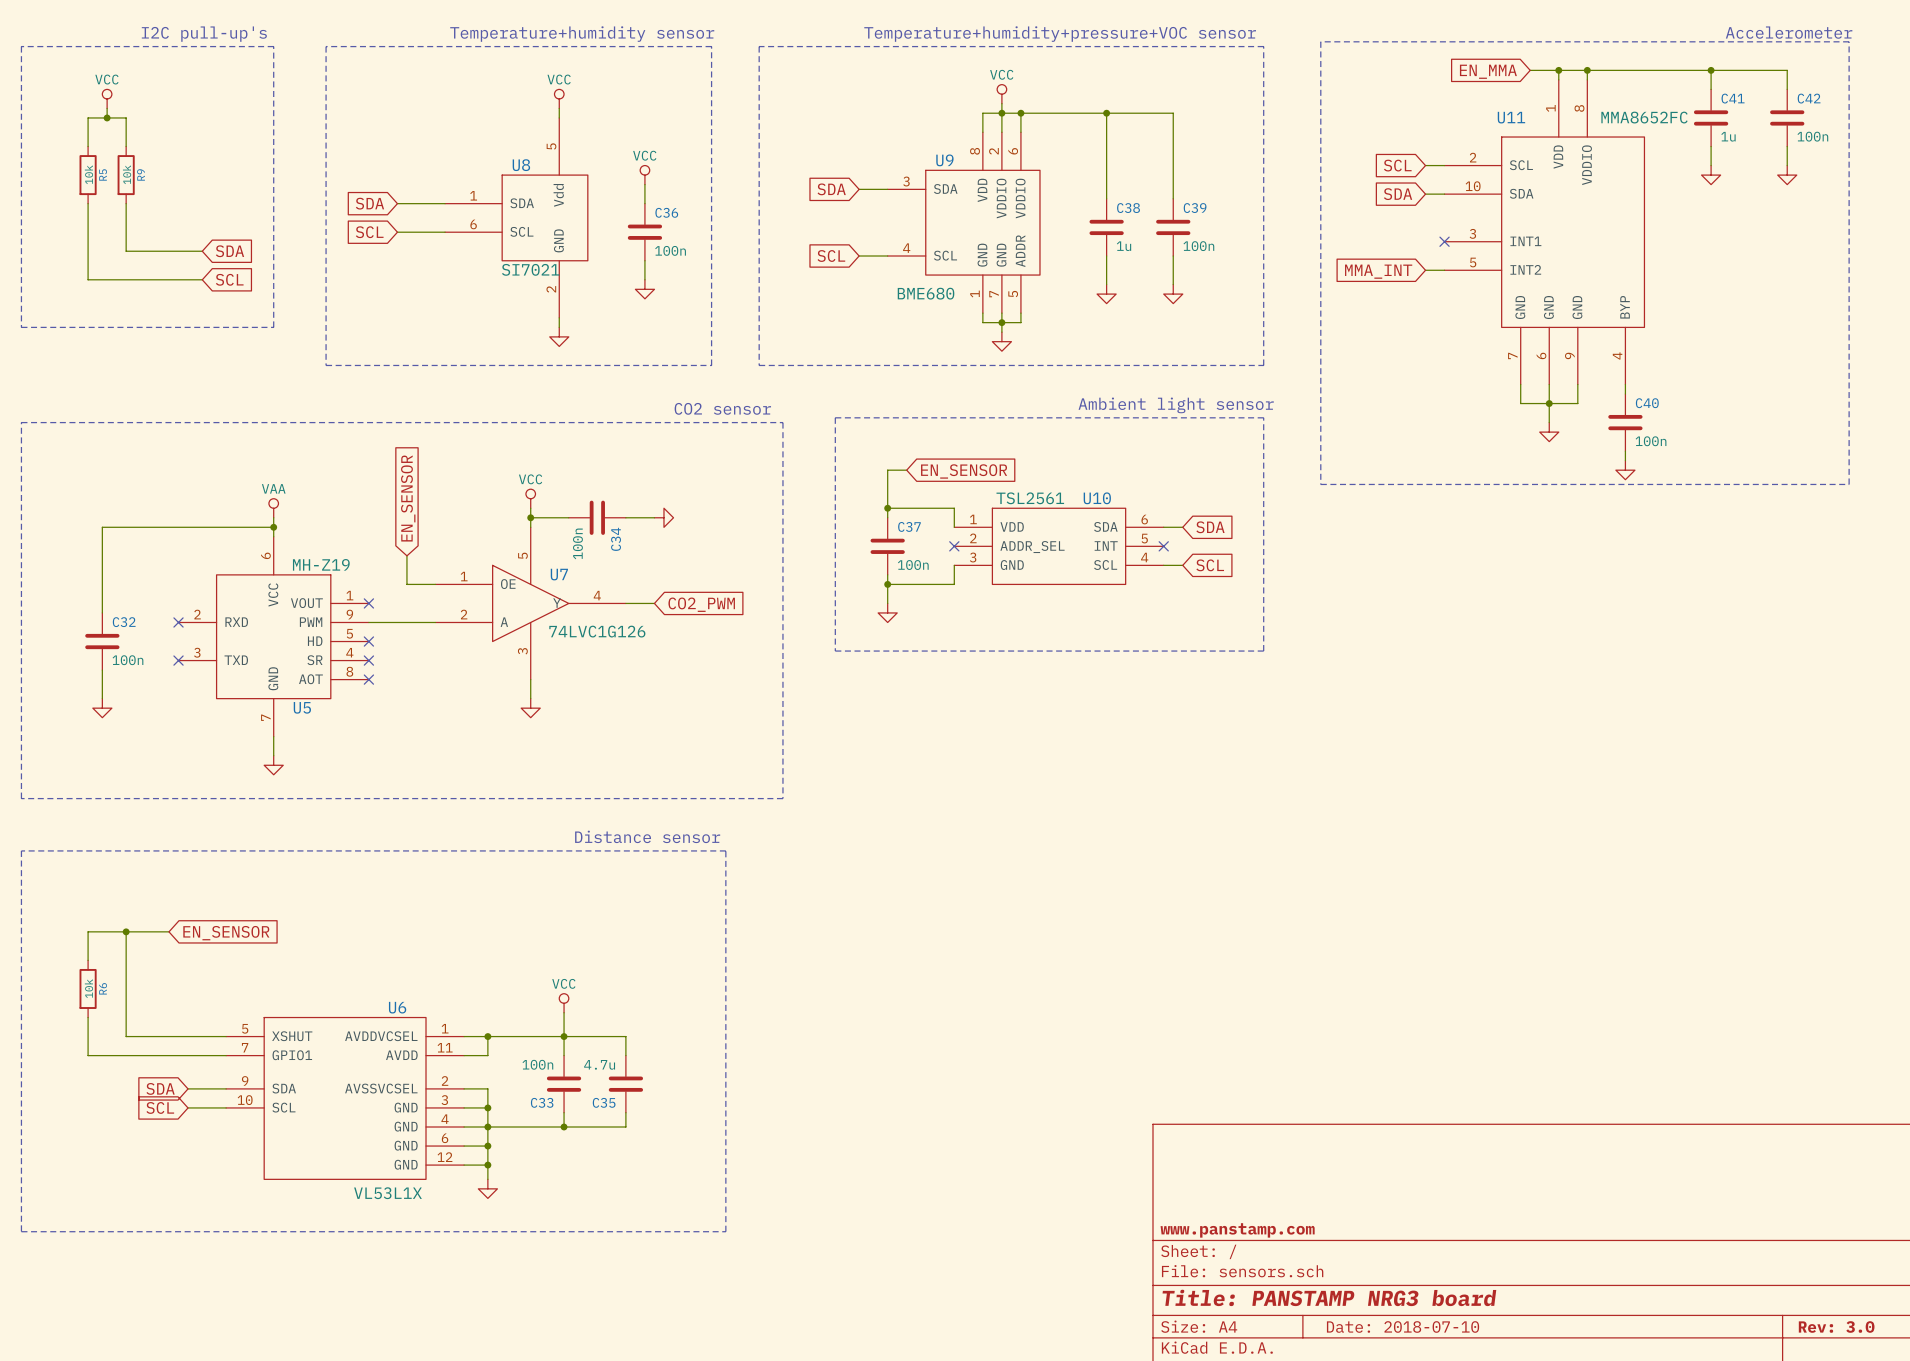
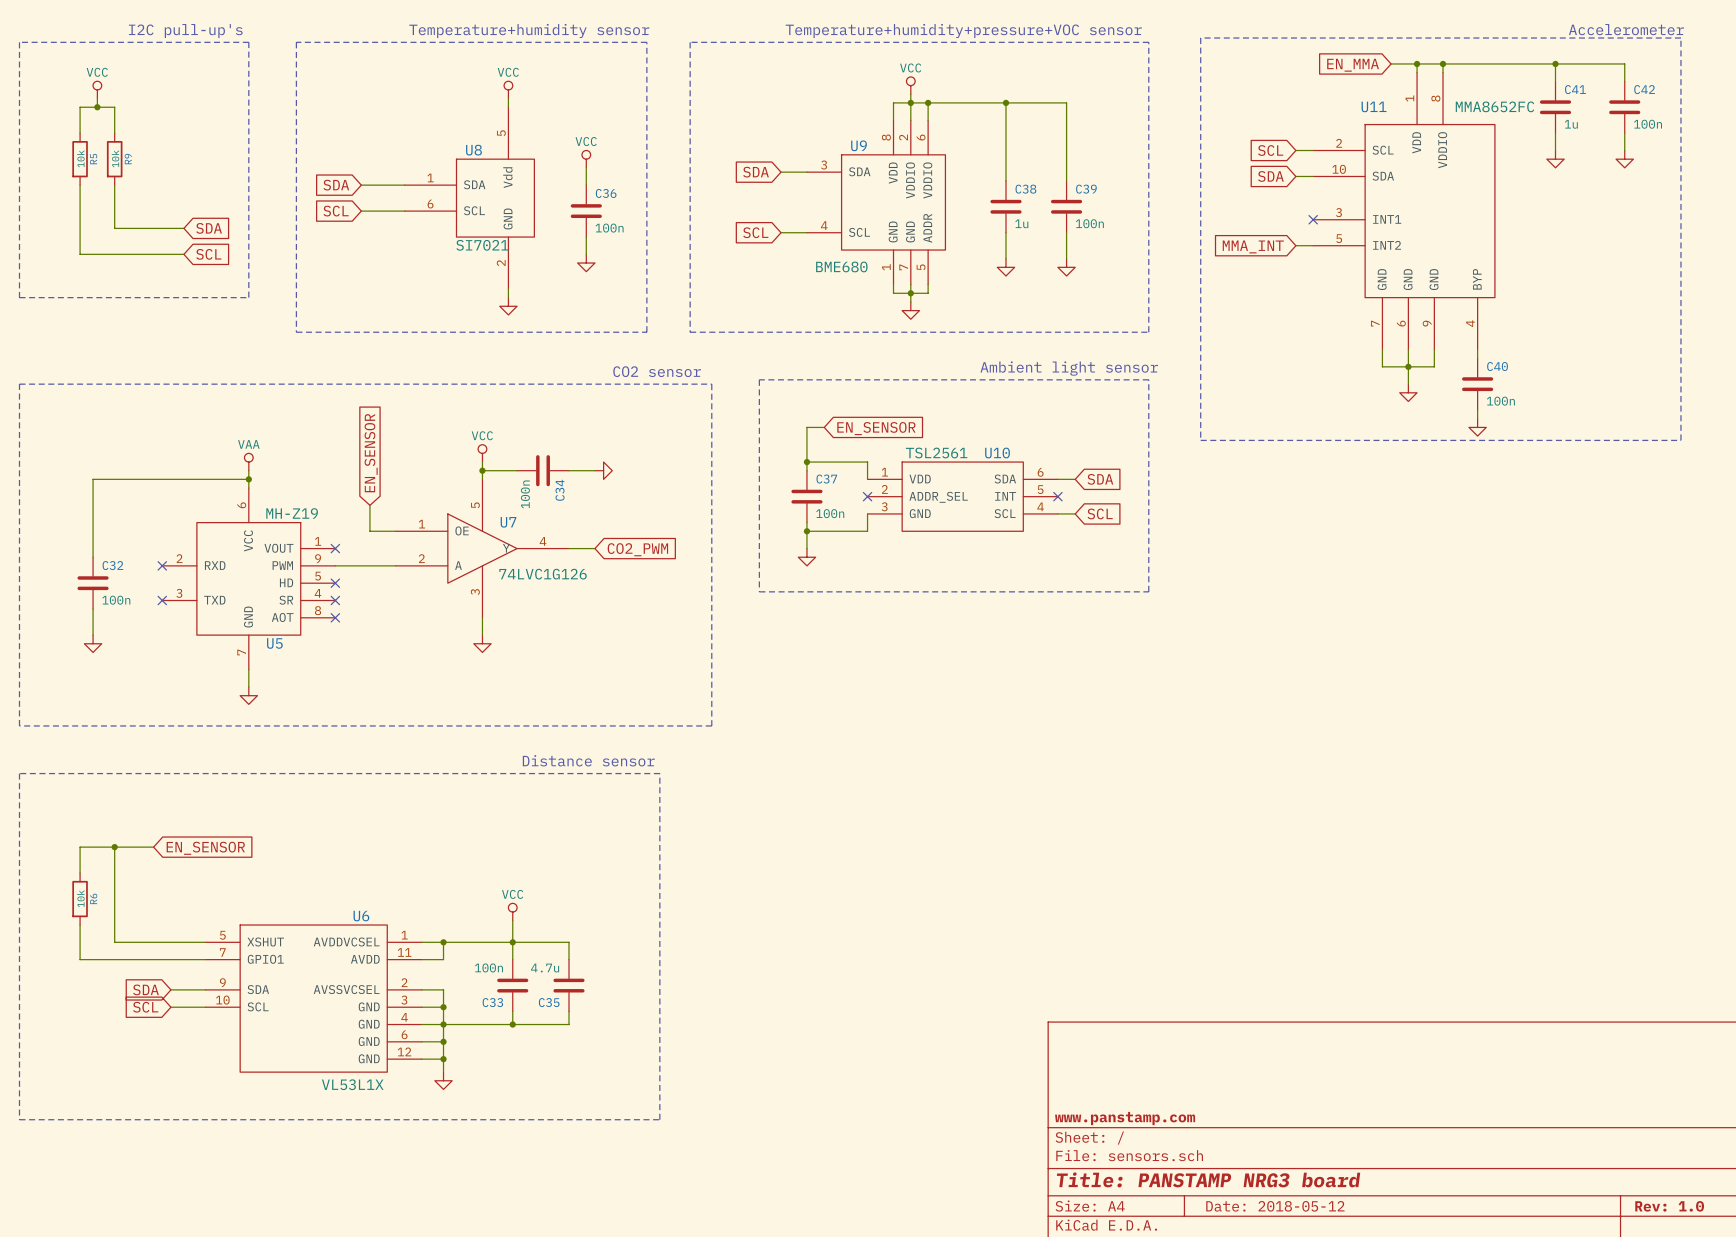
title block: Date: 2018-07-10 (1403, 1326) -> Date: 2018-05-12 (1275, 1206)
title block: Rev: 3.0 (1836, 1326) -> Rev: 1.0 (1669, 1206)

